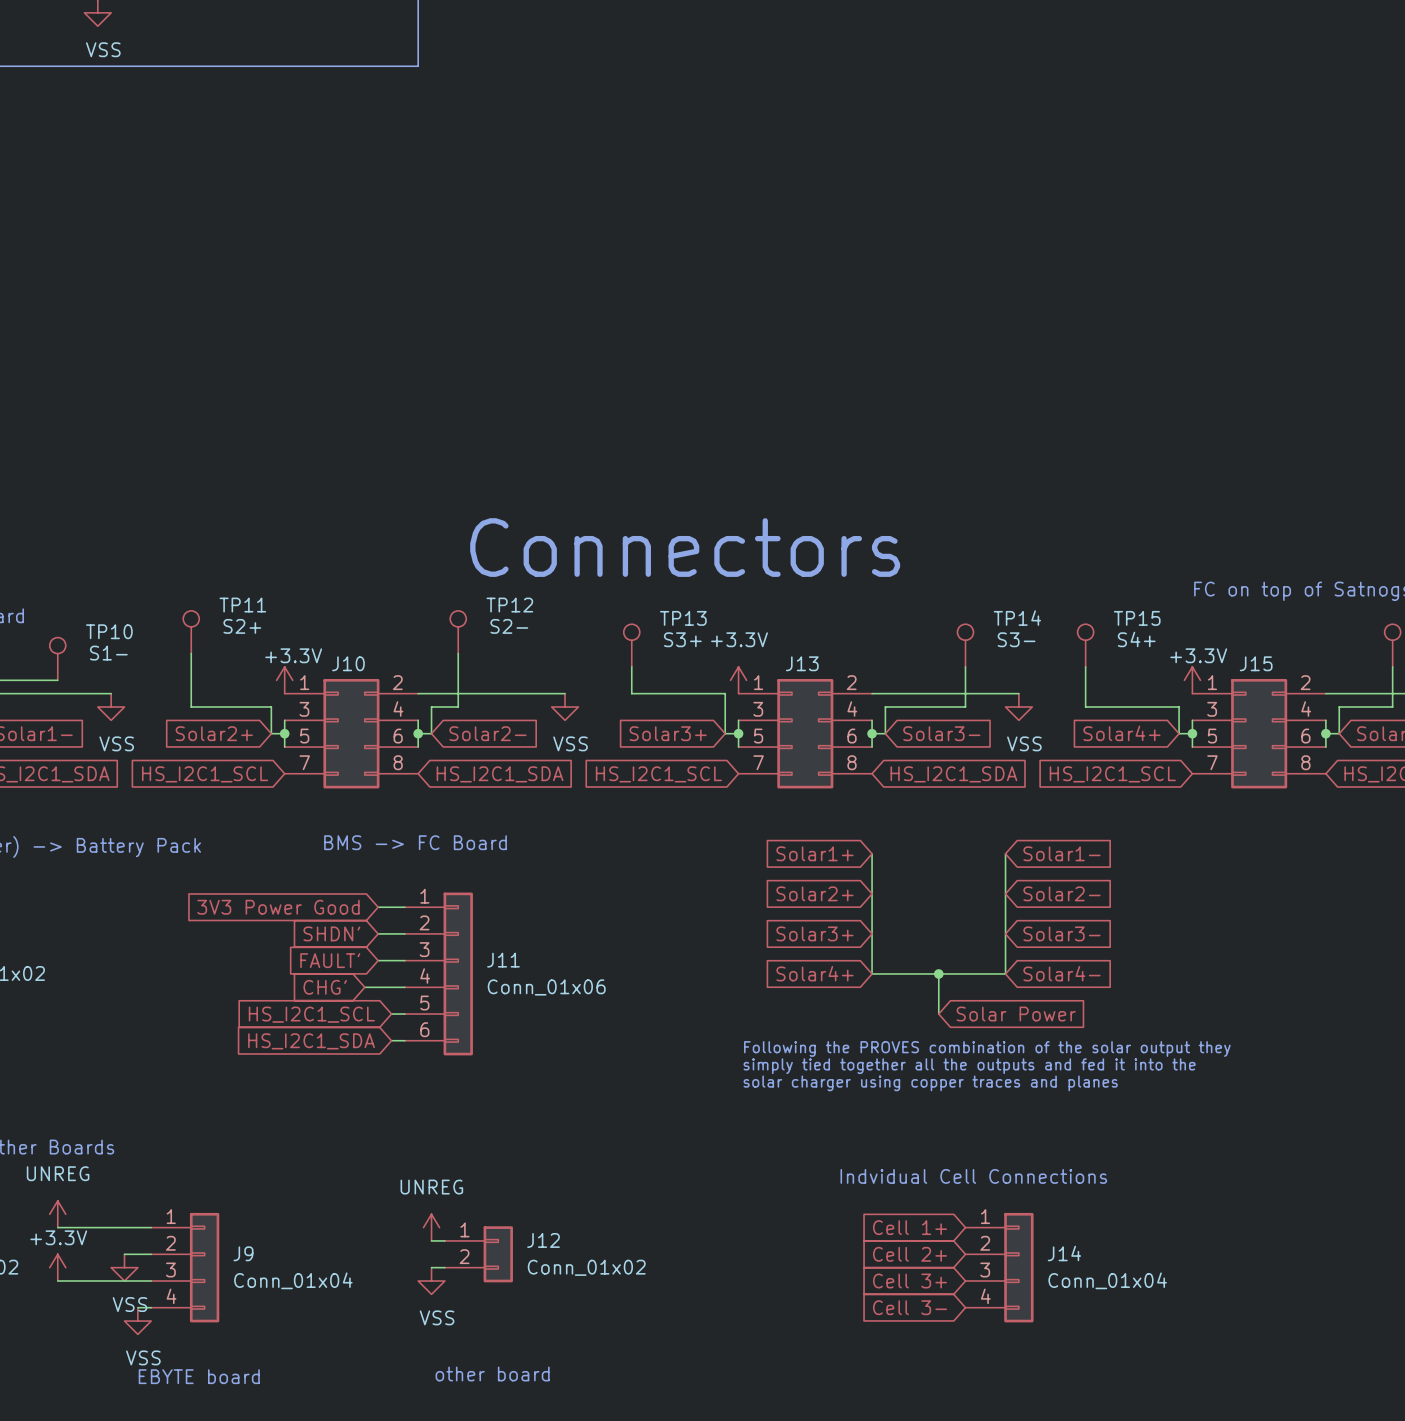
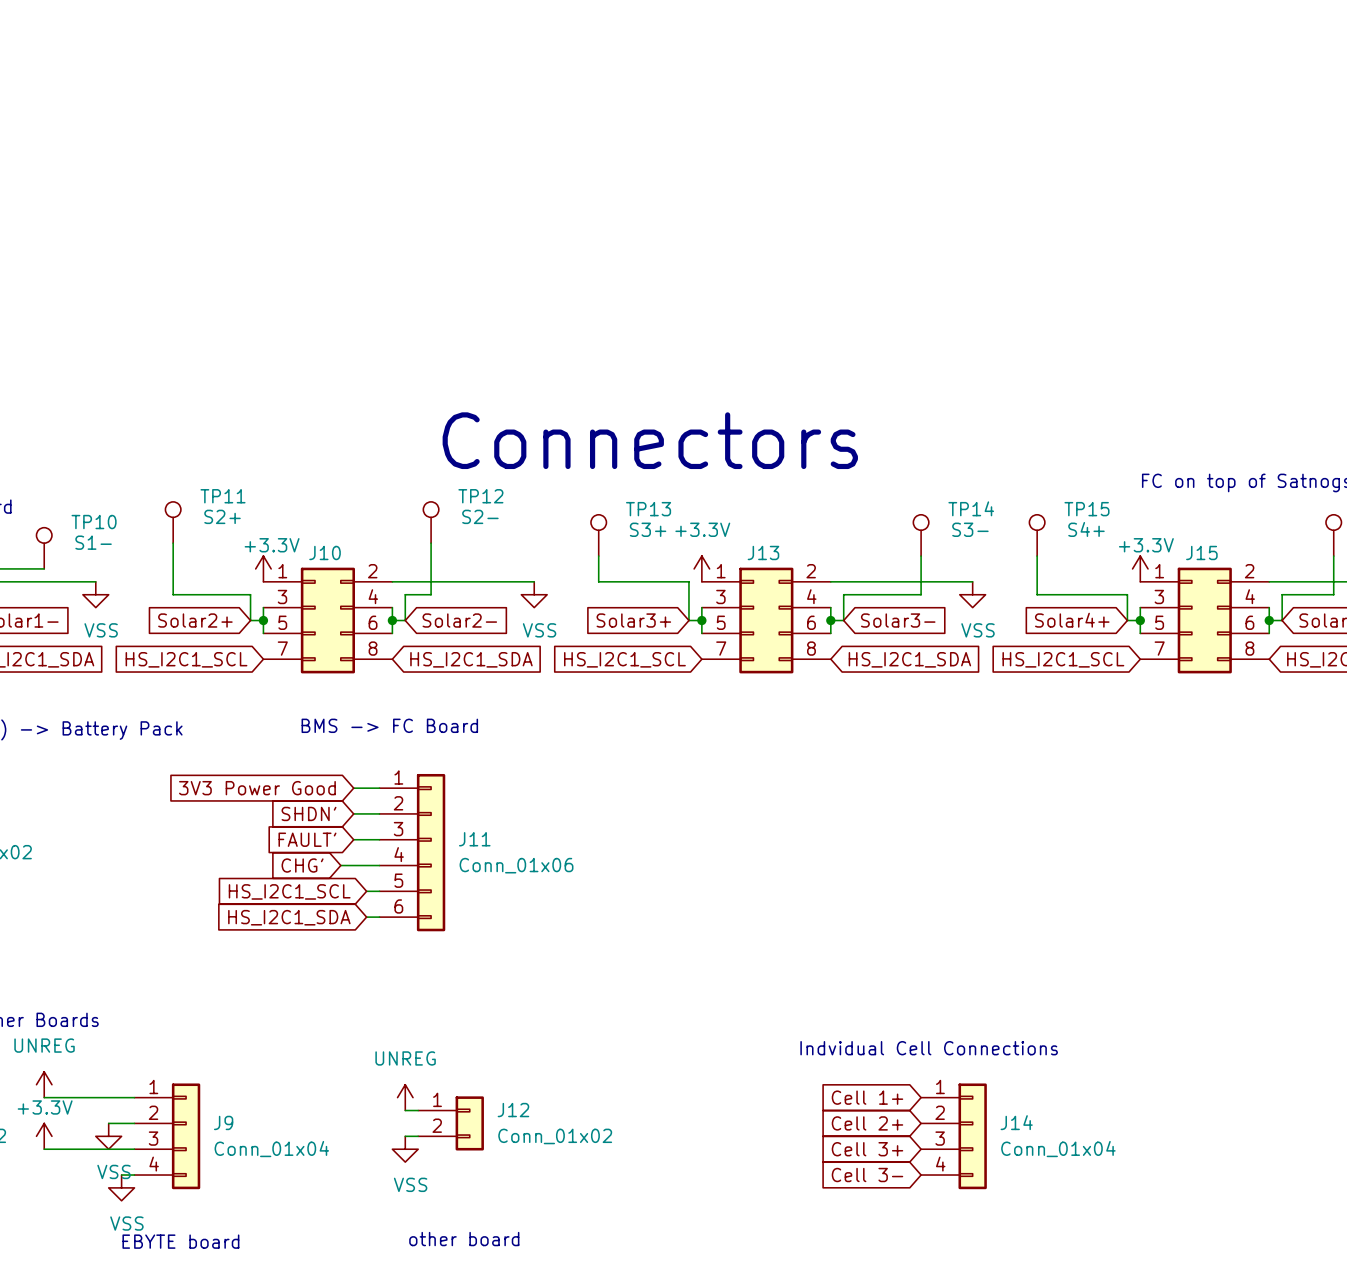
global label: Solar1+ (814, 853) -> none
wire: (872, 853) (872, 973) (1005, 973) (1005, 853) -> none
global label: Solar1- (1061, 853) -> none
global label: Solar2+ (814, 893) -> none
global label: Solar2- (1061, 893) -> none
global label: Solar3+ (814, 933) -> none
global label: Solar3- (1061, 933) -> none
global label: Solar4+ (814, 973) -> none
wire: (938, 973) (938, 1014) -> none
junction: (938, 973) -> none
global label: Solar4- (1061, 973) -> none
global label: Solar Power (1016, 1014) -> none
text: Following the PROVES combination of the solar output they (987, 1048) -> none
text: simply tied together all the outputs and fed it into the (969, 1066) -> none
text: solar charger using copper traces and planes (930, 1083) -> none

